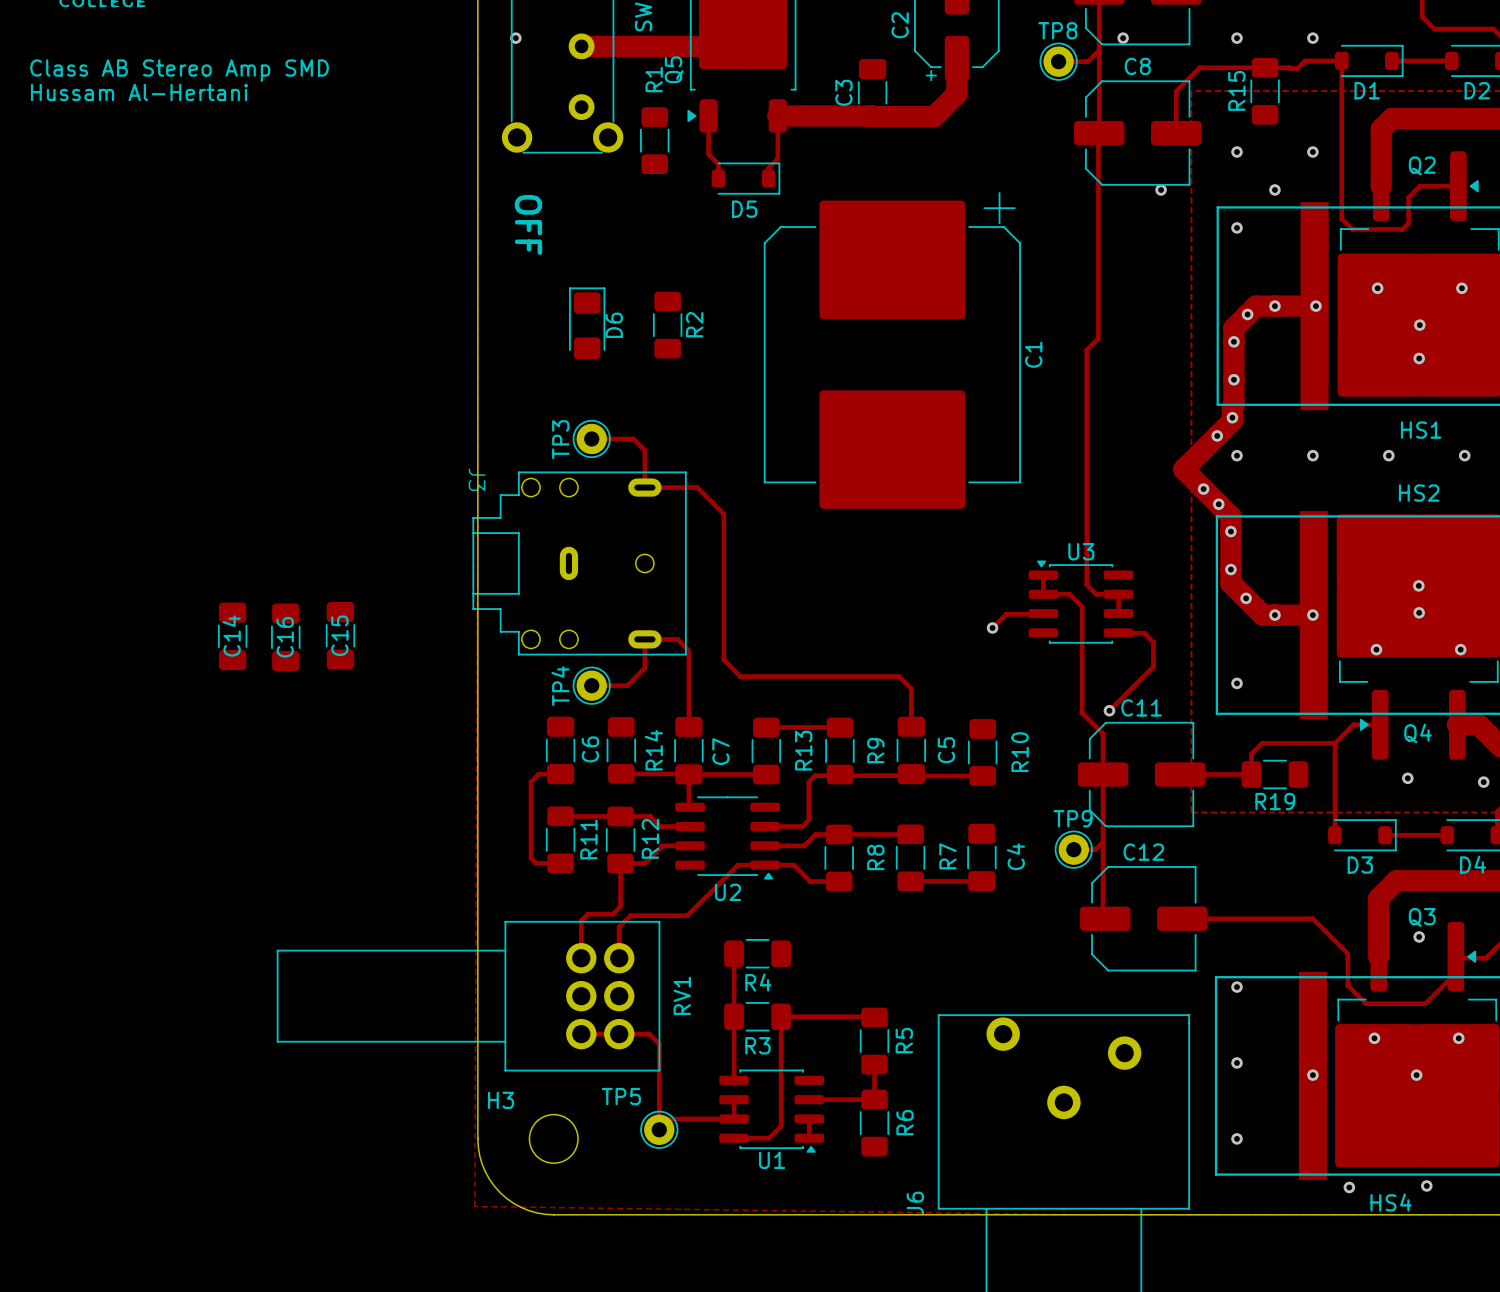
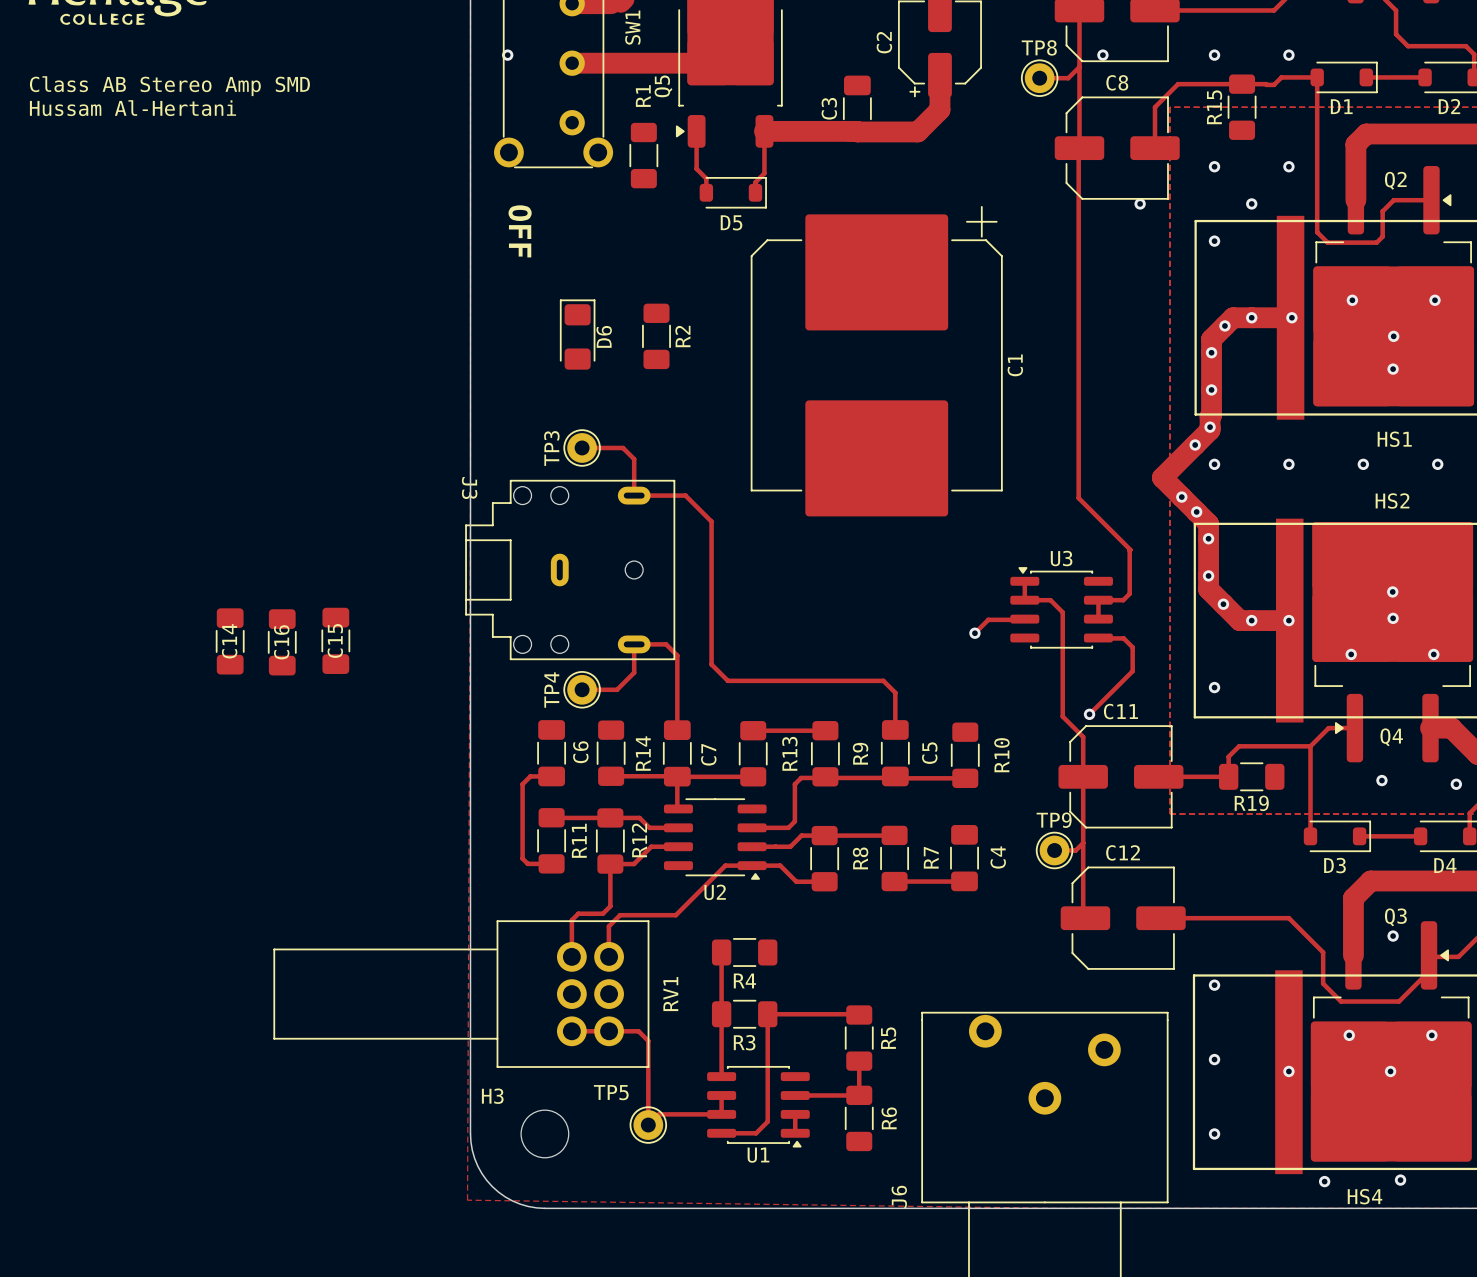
track: (1098, 338) (1086, 350) (1086, 584) (1096, 594) (1118, 594) -> (1078, 349) (1078, 498) (1130, 549) (1129, 593) (1123, 600) (1098, 600)

